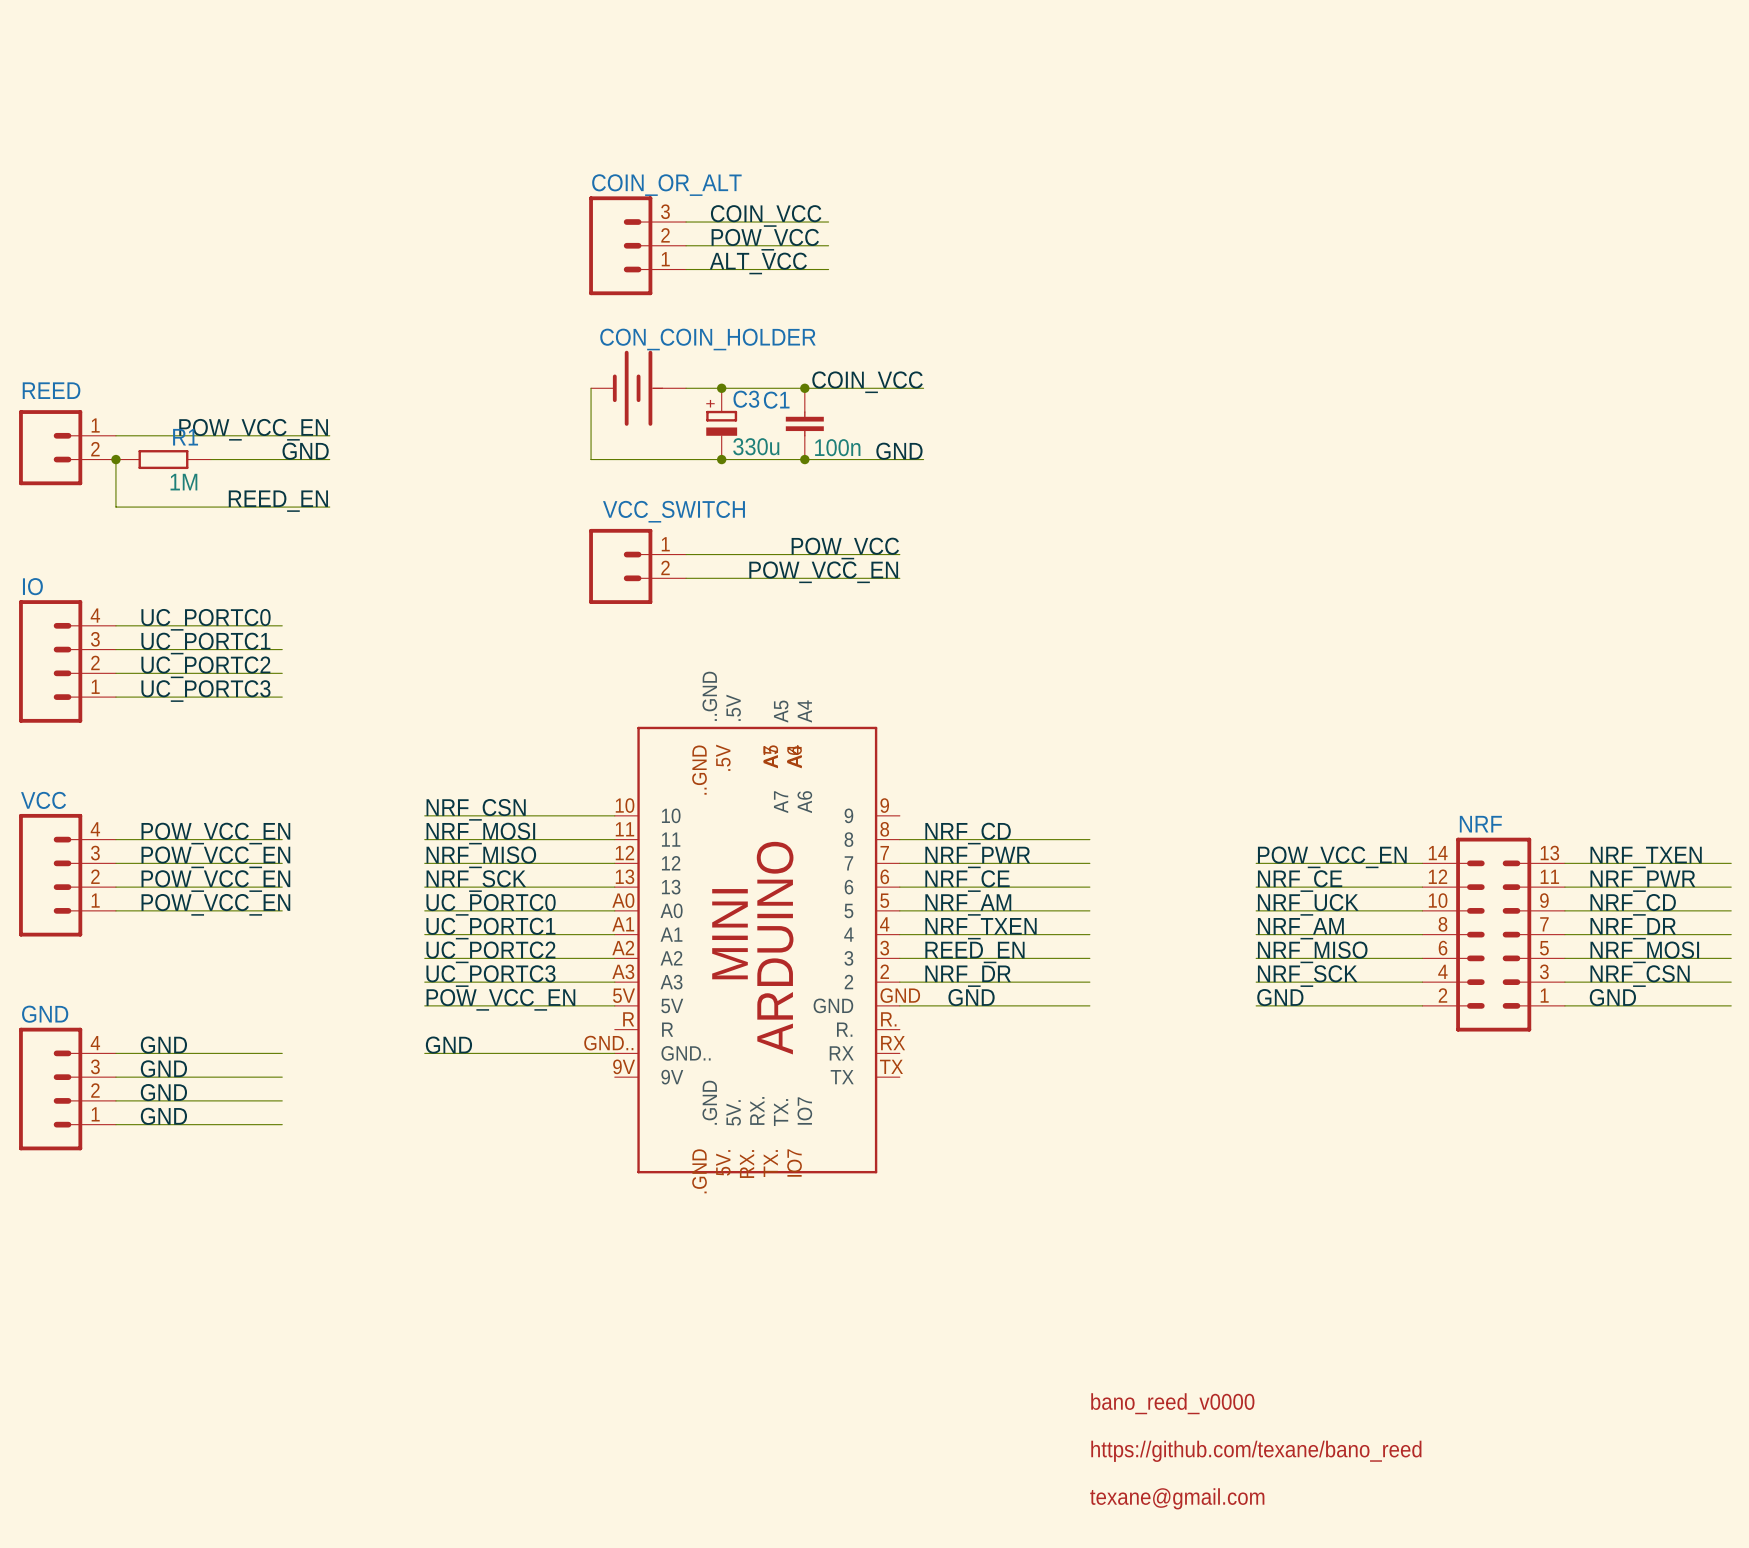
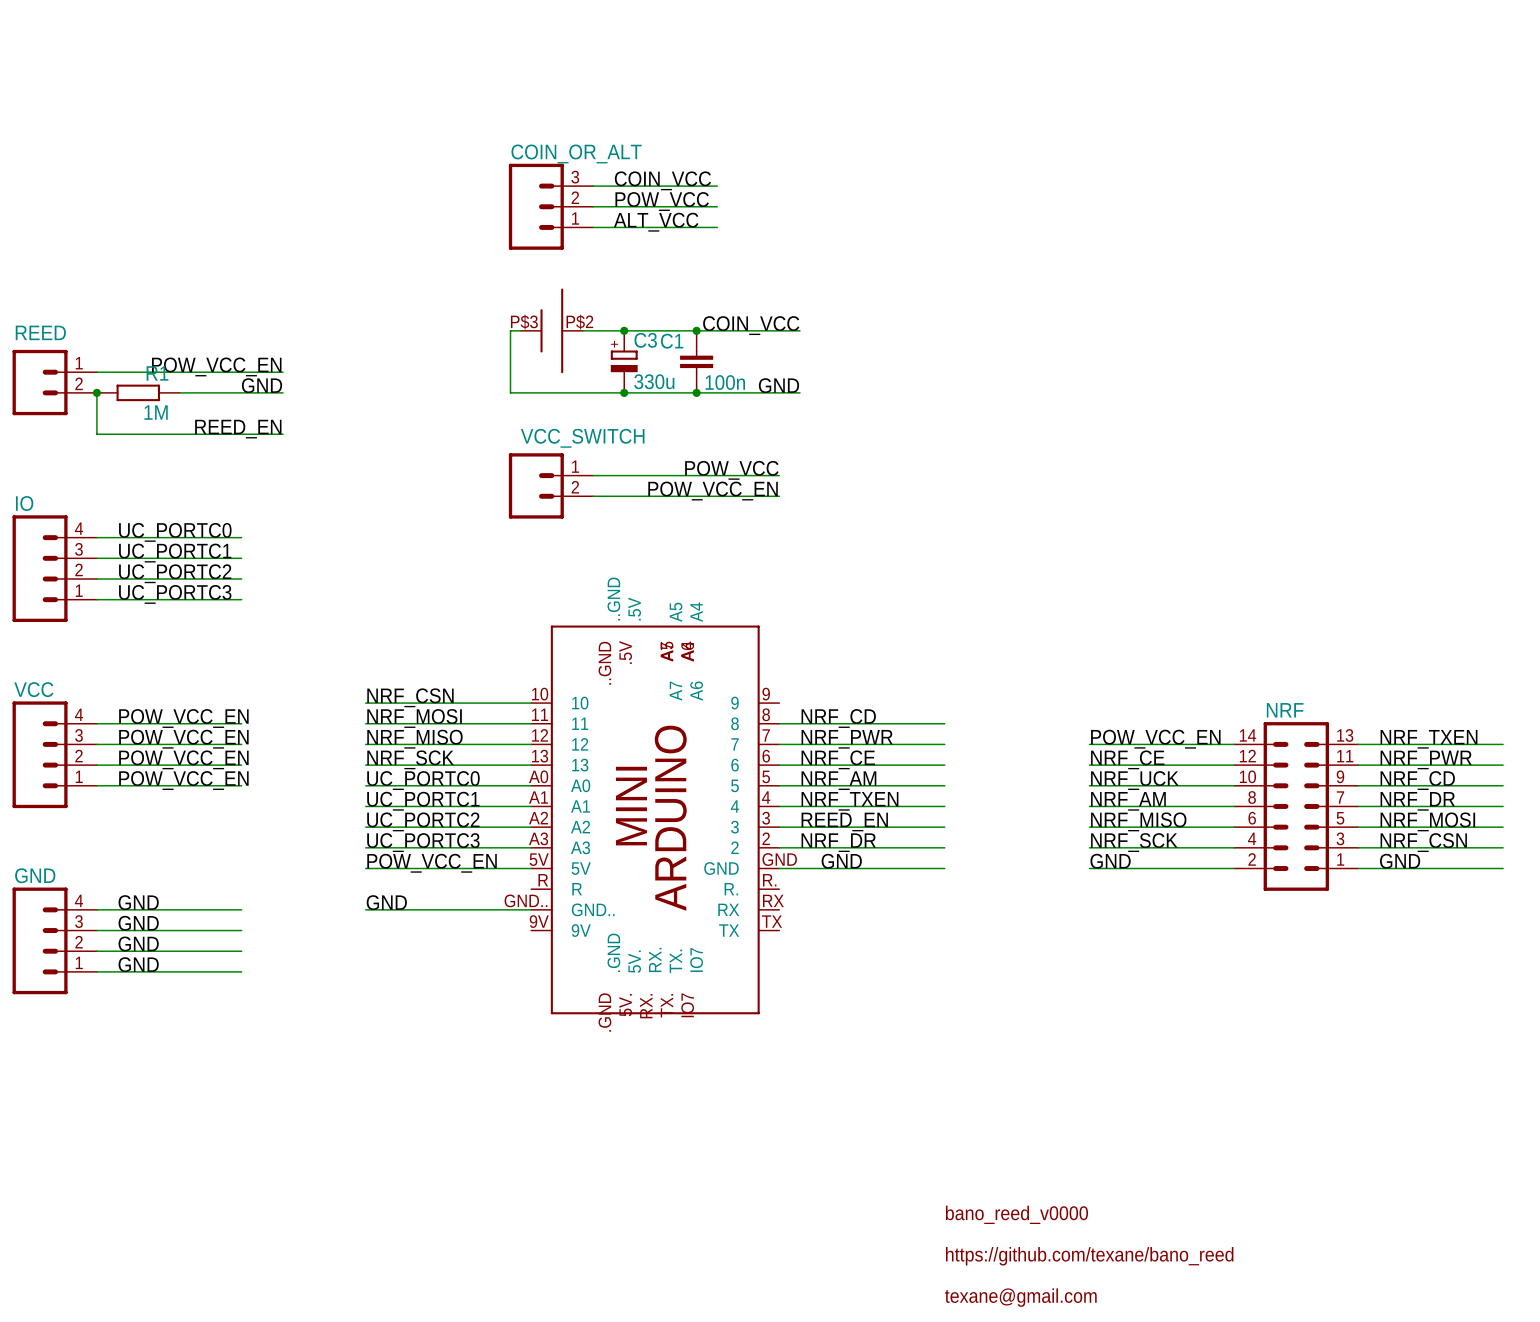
CON_COIN_HOLDER: (638, 388) -> none
part: none -> (551, 330)

